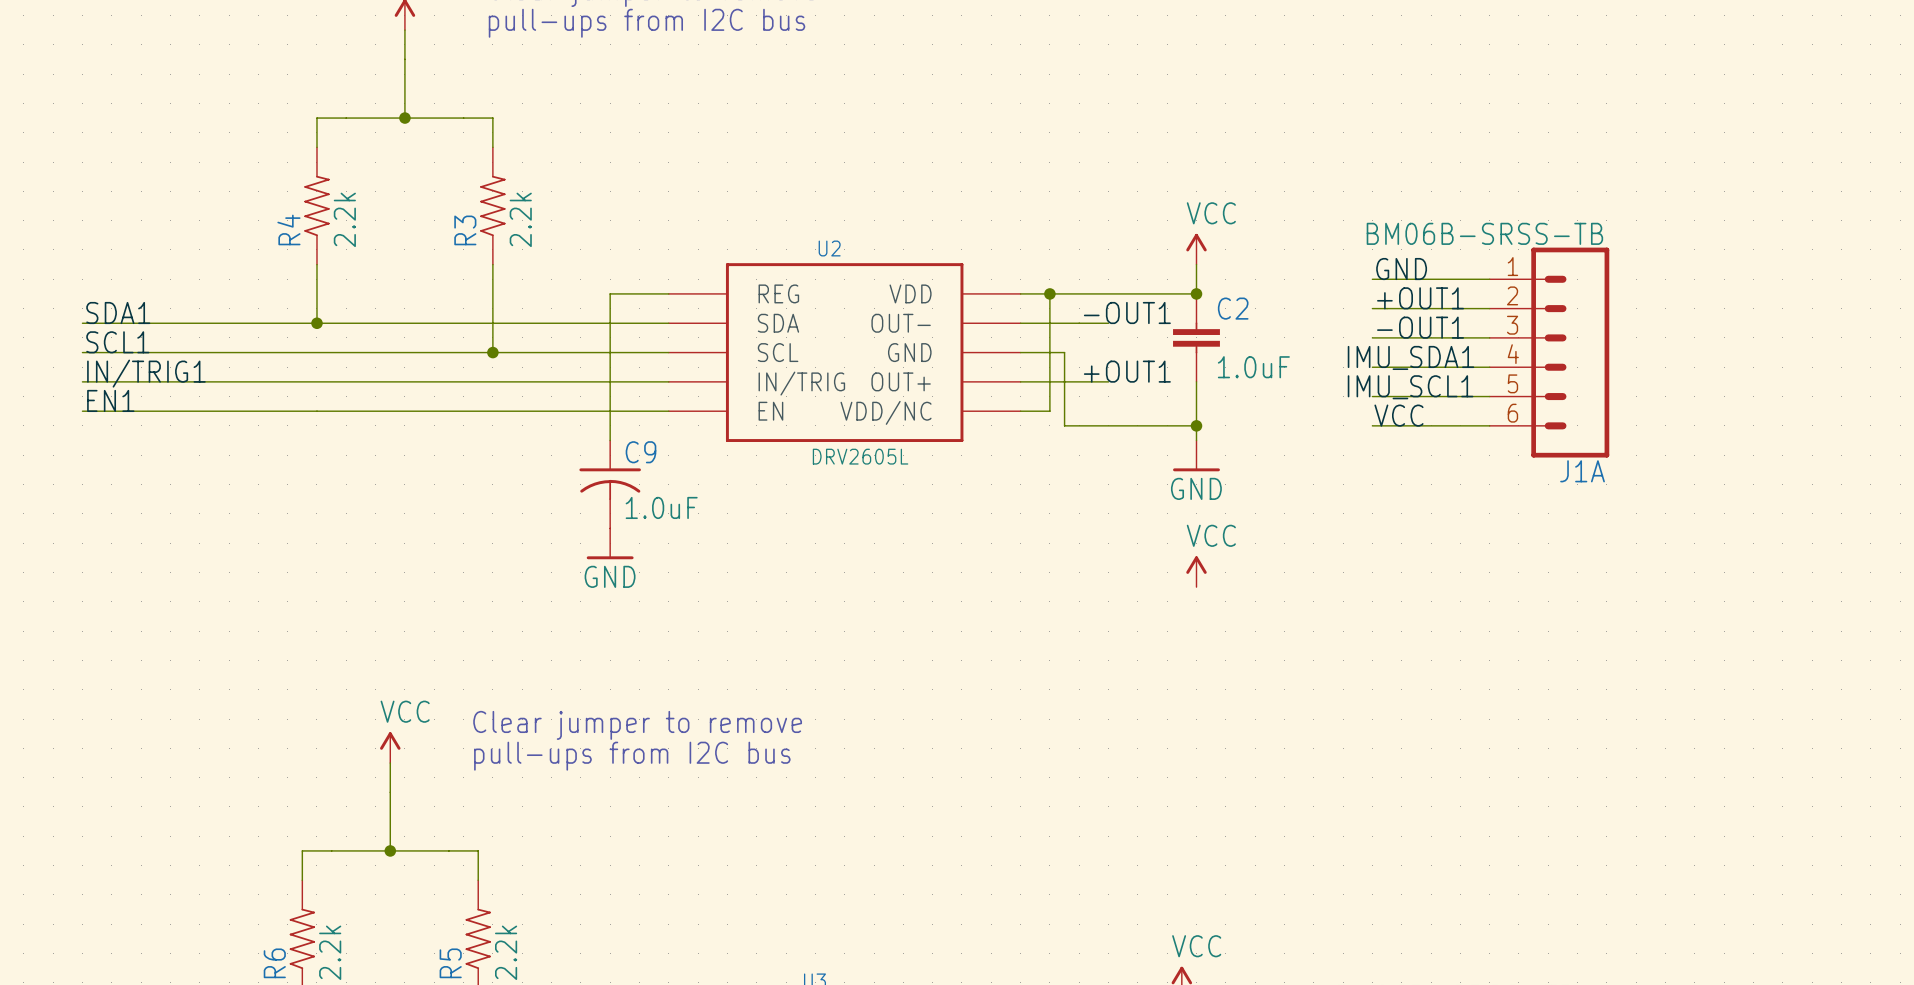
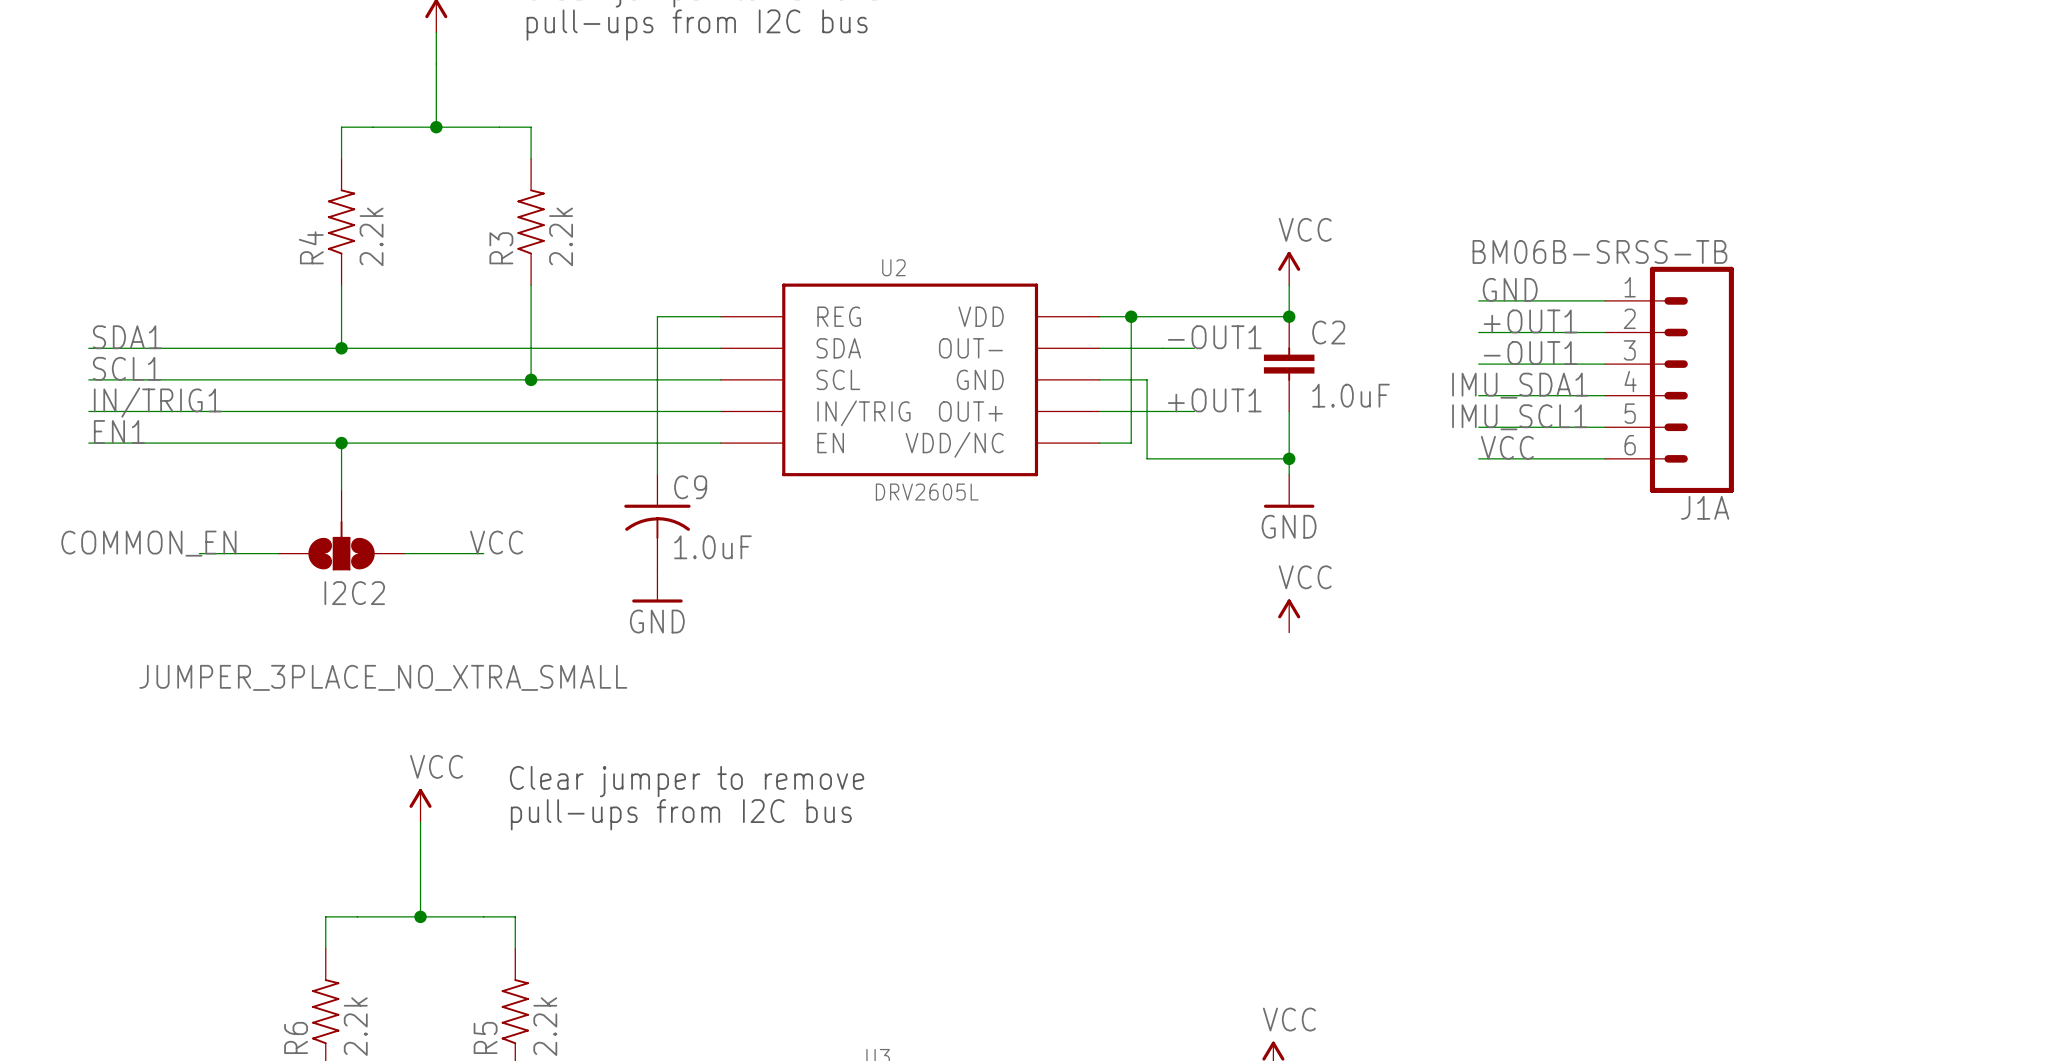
wire: none -> (341, 443) (341, 490)
junction: none -> (341, 443)
I2C2: none -> JUMPER_3PLACE_NO_XTRA_SMALL (341, 530)
label: none -> VCC (496, 542)
label: none -> COMMON_EN (148, 543)
wire: none -> (199, 553) (278, 553)
wire: none -> (404, 553) (483, 553)

